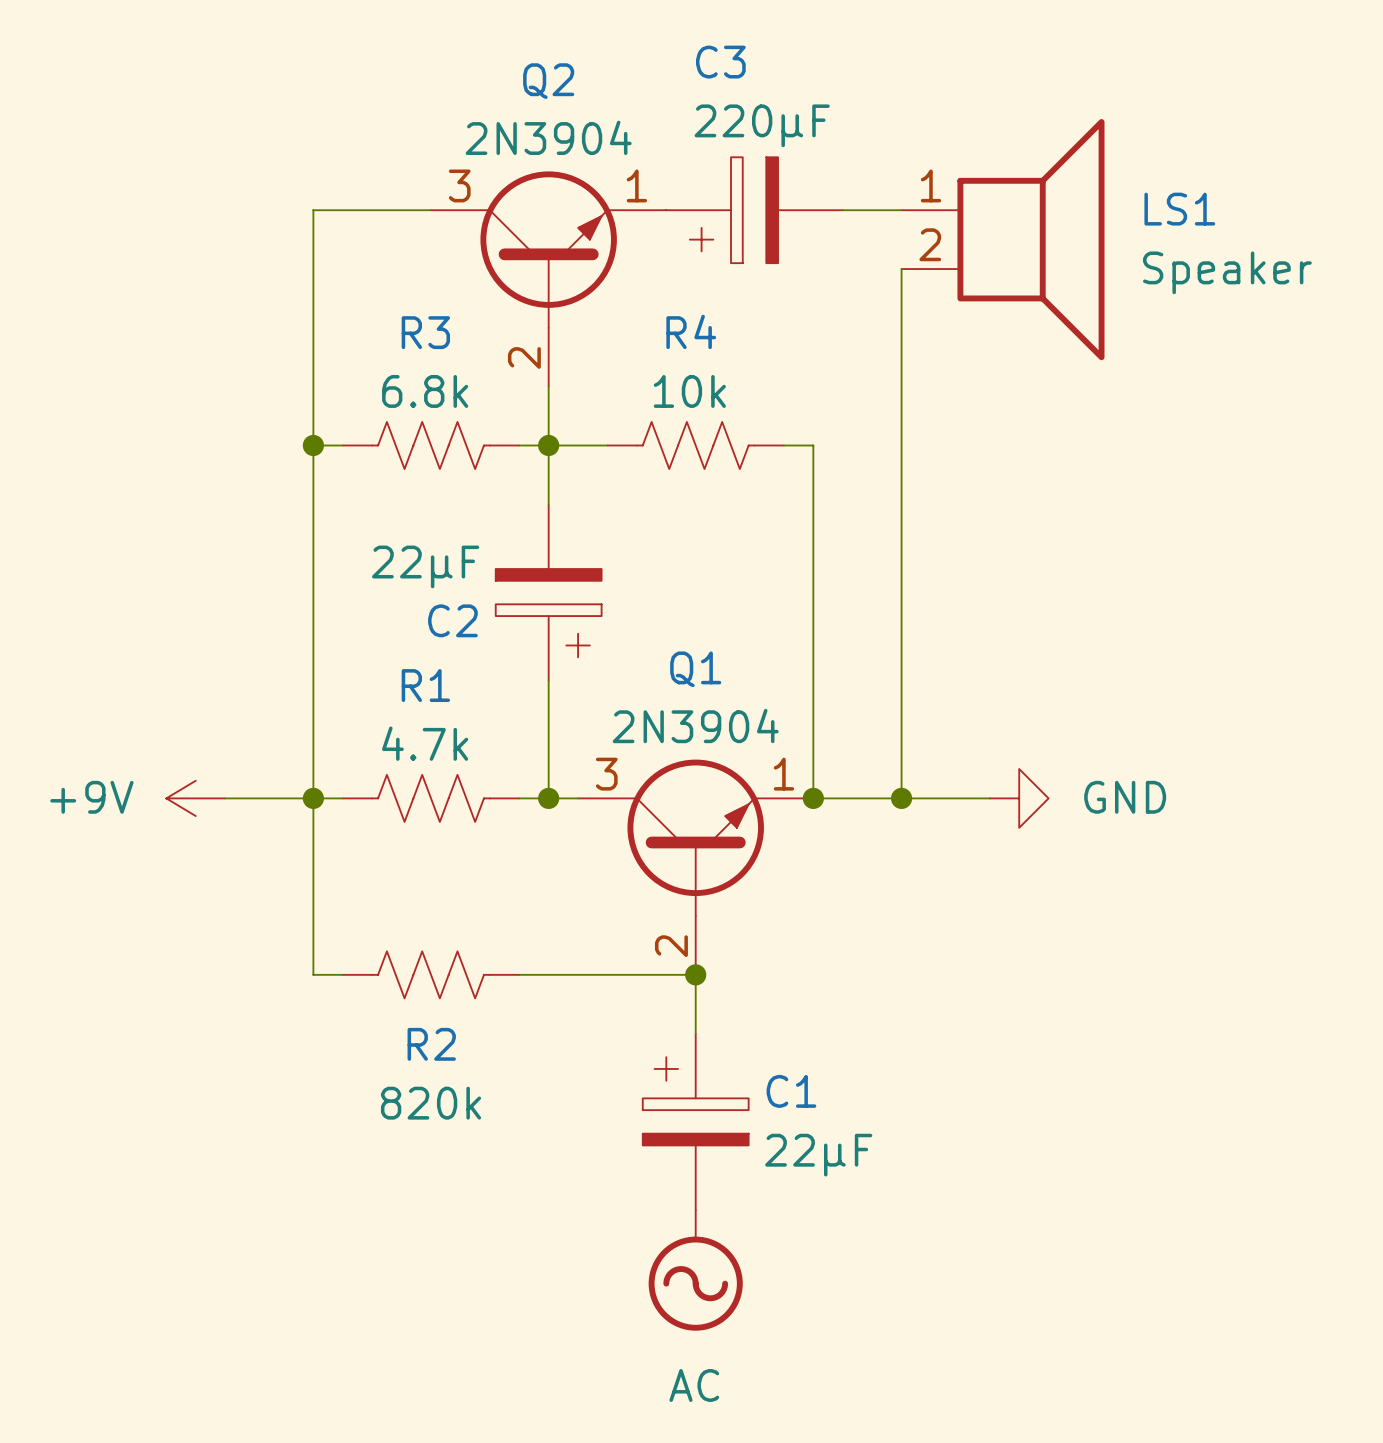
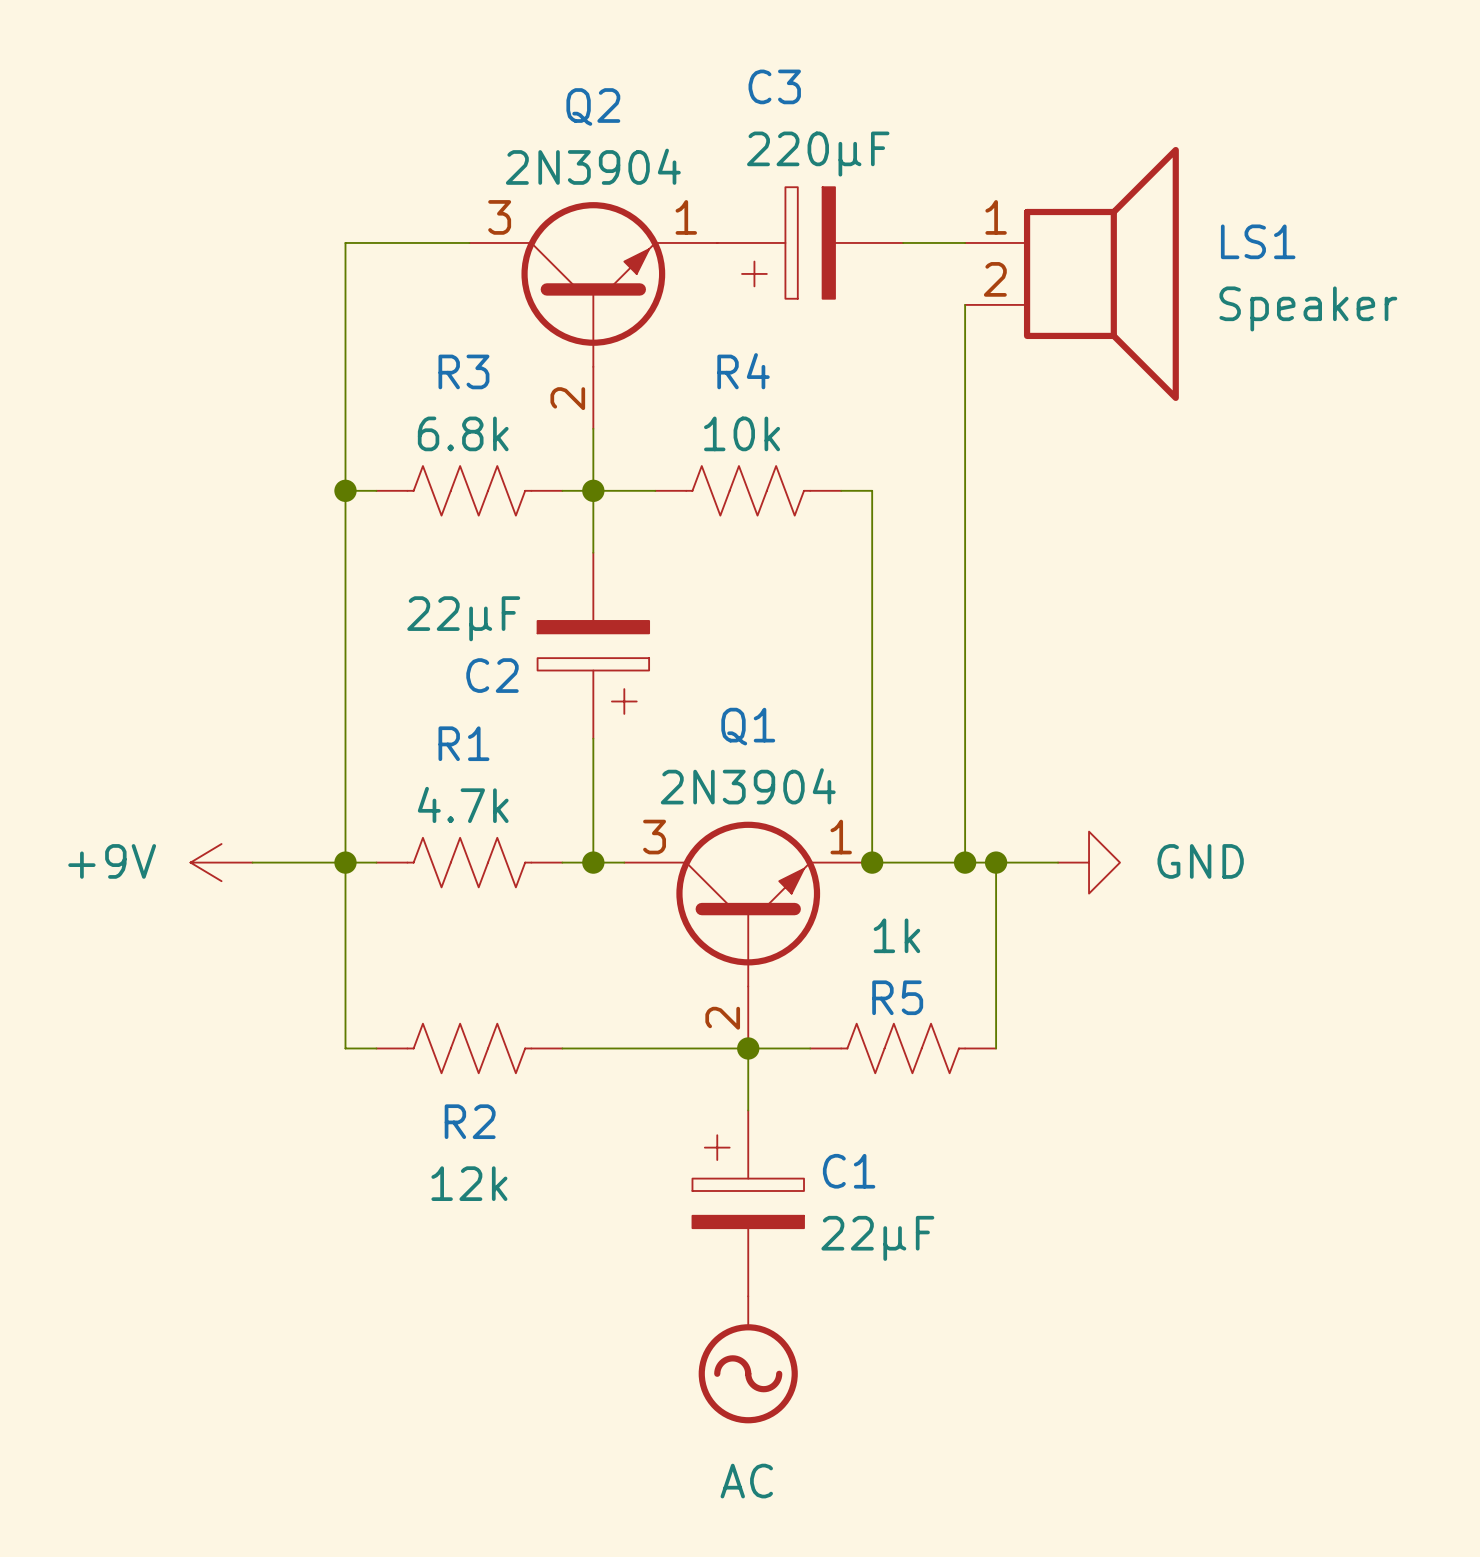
wire: none -> (996, 862) (996, 1048)
junction: none -> (996, 862)
wire: none -> (748, 1048) (810, 1048)
R5: none -> 1k (903, 1048)
R2 value: 820k (431, 1103) -> 12k (469, 1183)

